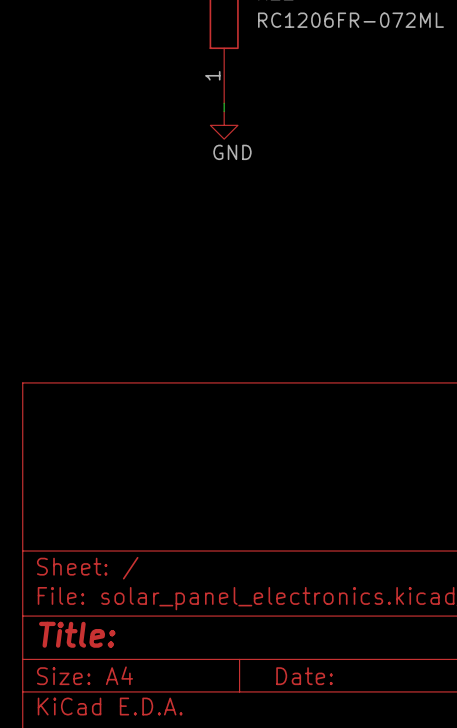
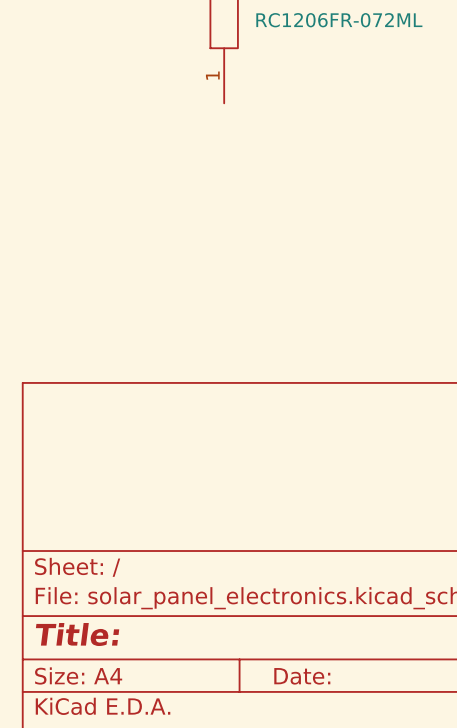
wire: (224, 103) (224, 111) -> none
power symbol: GND (224, 125) -> none

